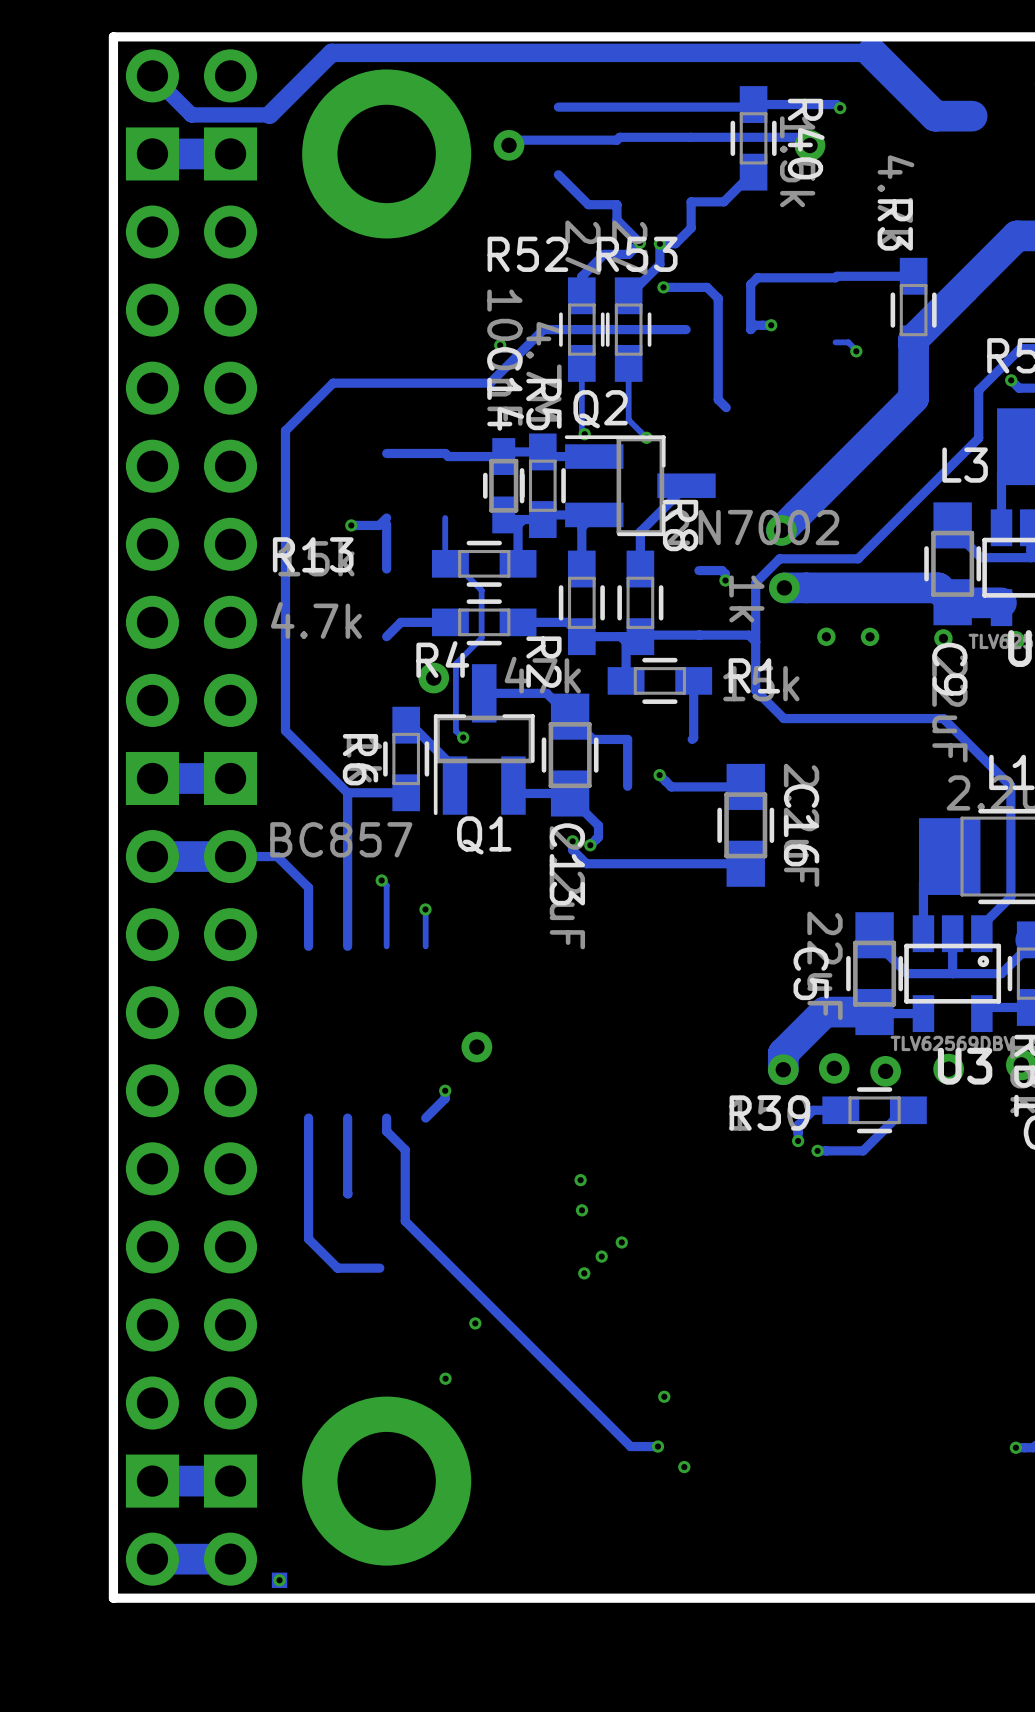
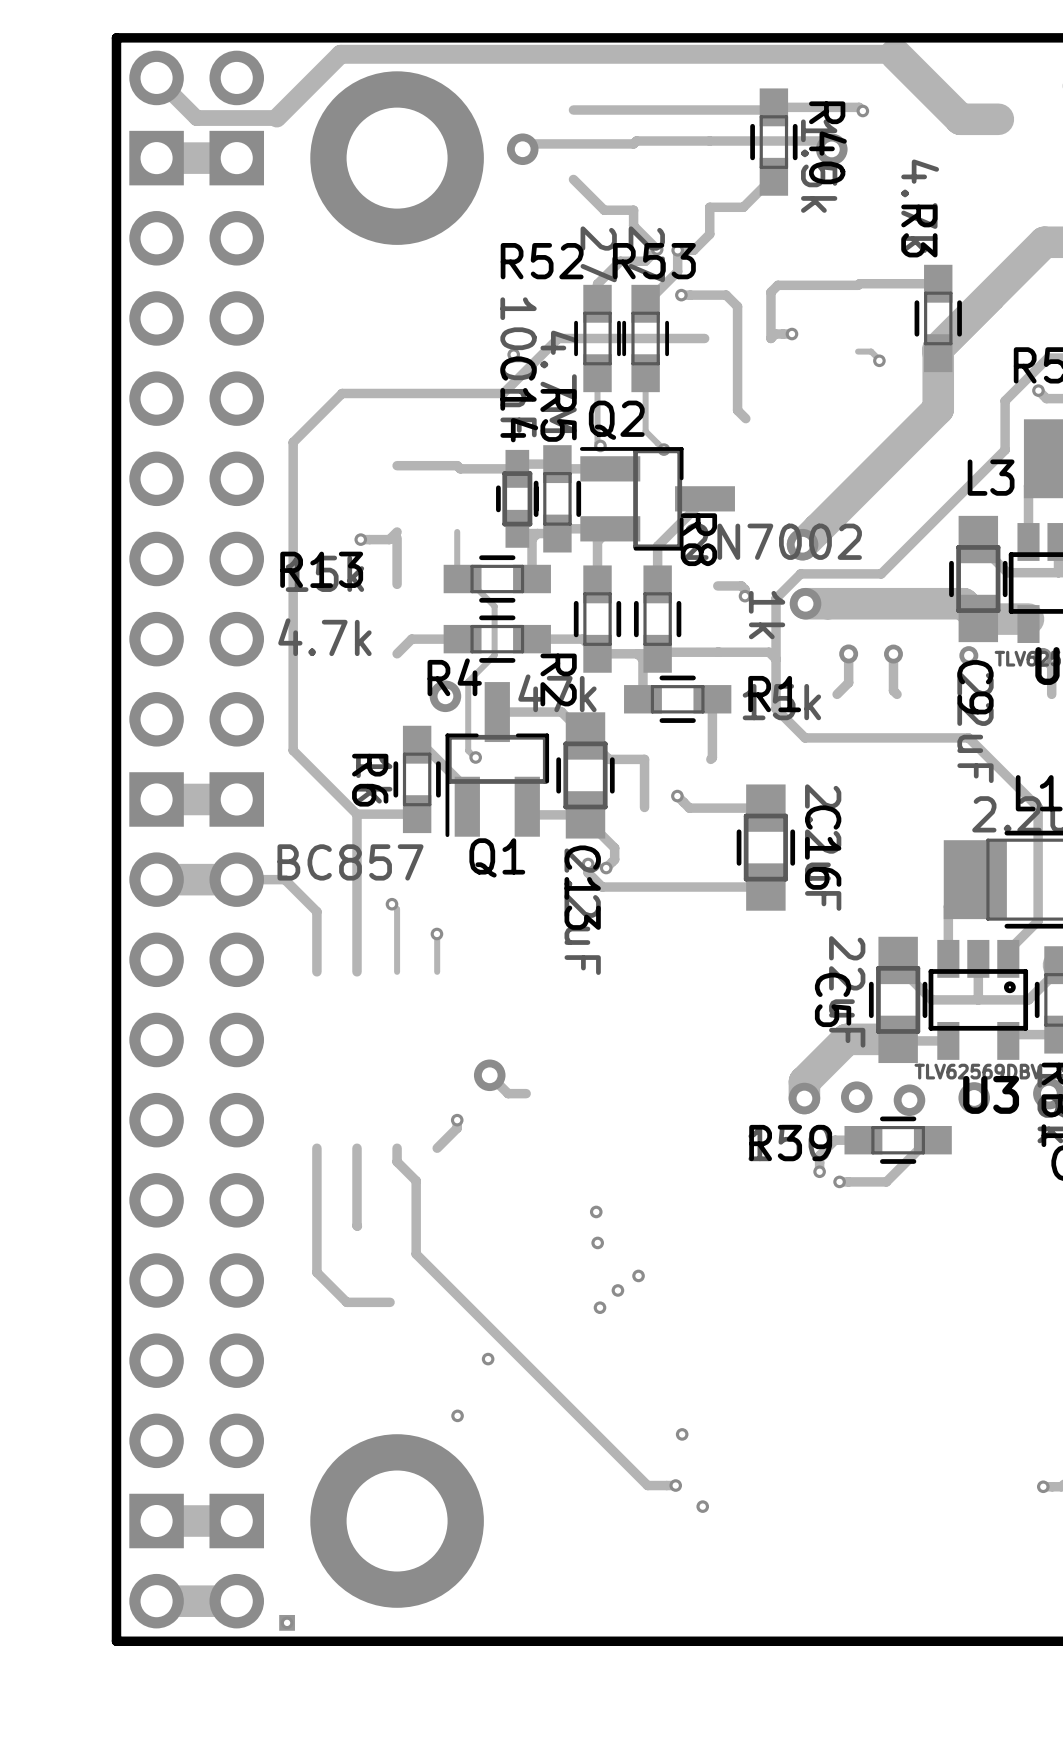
track: none -> (848, 653) (848, 682) (837, 694)
track: none -> (893, 654) (893, 690) (897, 694)
track: none -> (1042, 657) (1051, 666) (1051, 694)
track: none -> (489, 1075) (508, 1093) (526, 1093)

